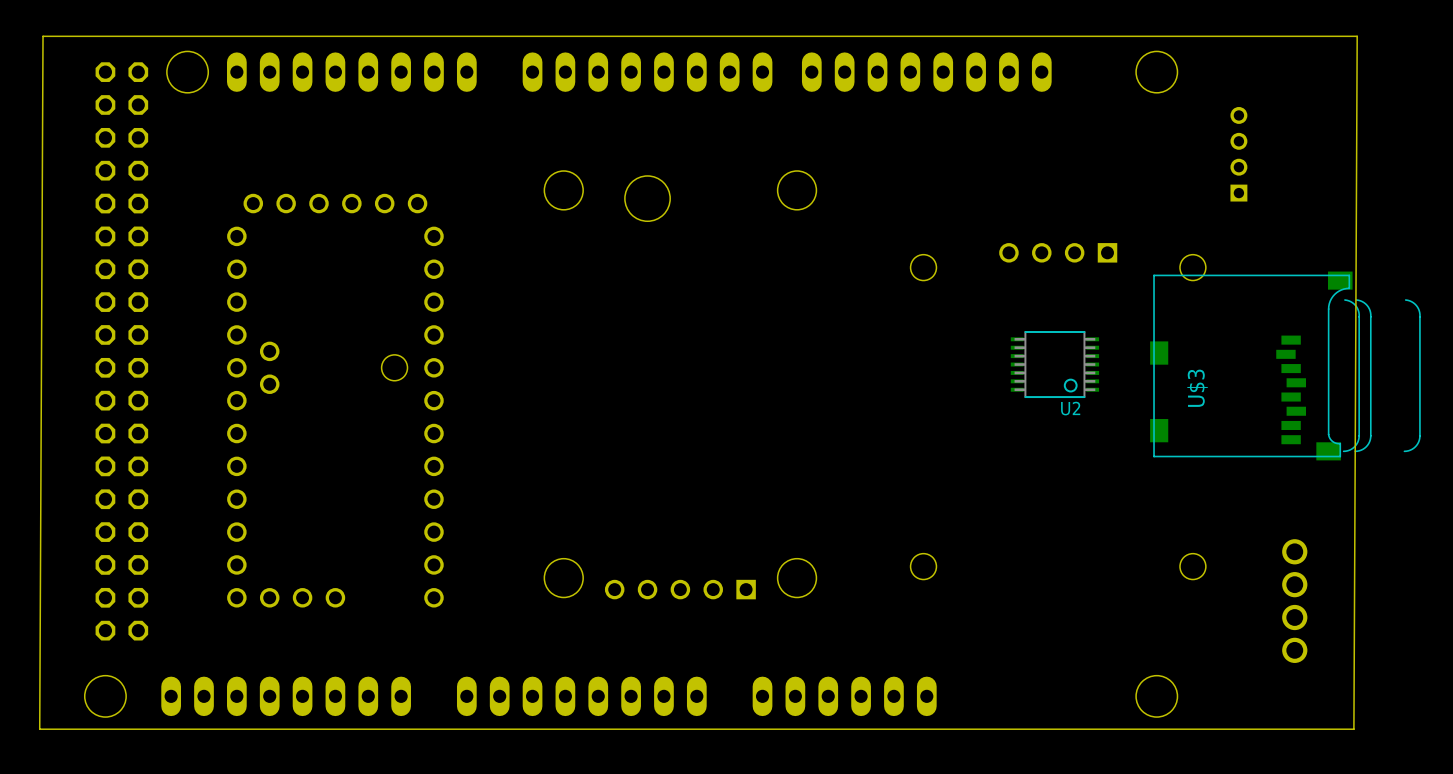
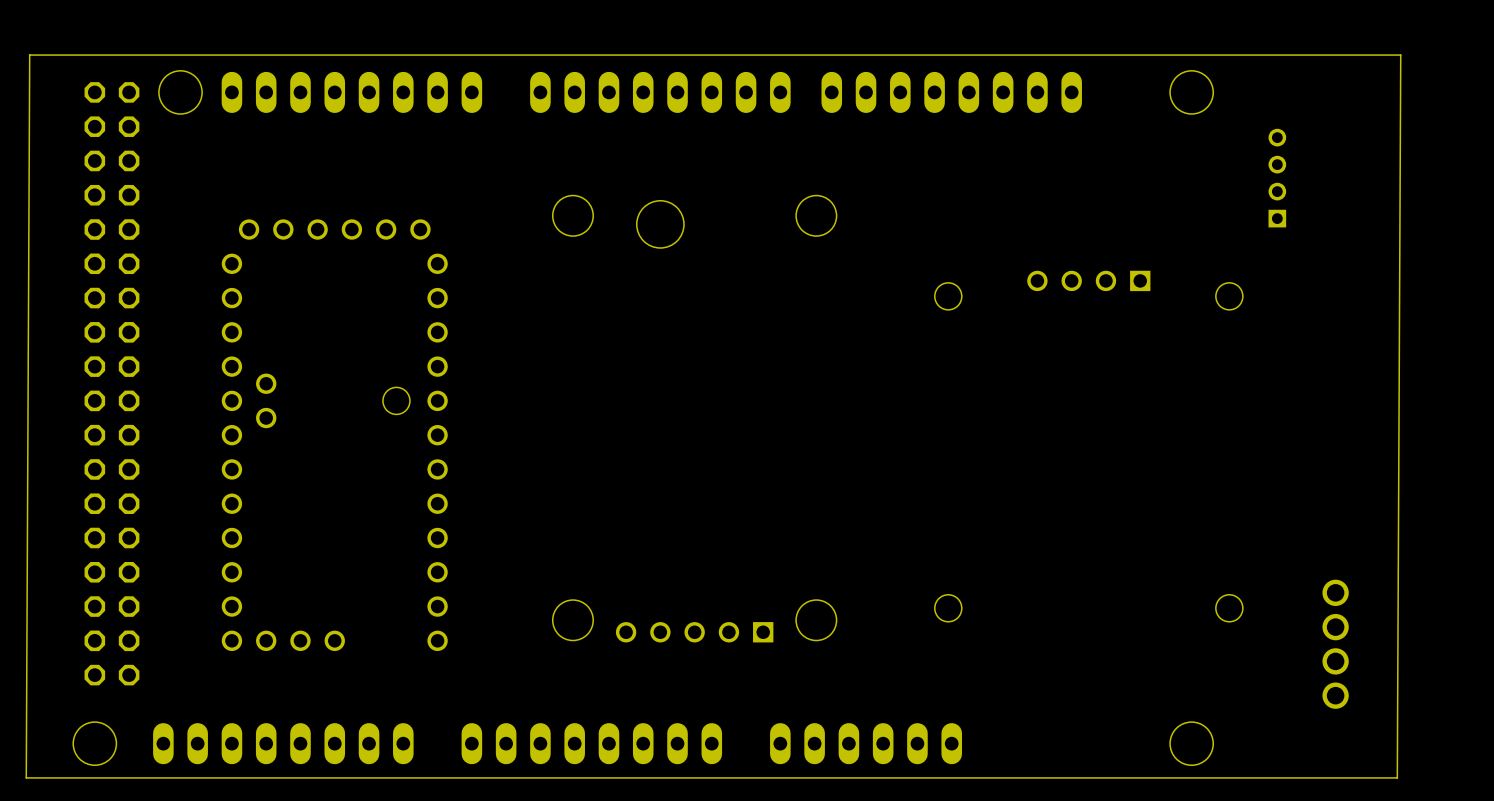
U2: (1054, 364) -> none
U$3: (1285, 365) -> none

